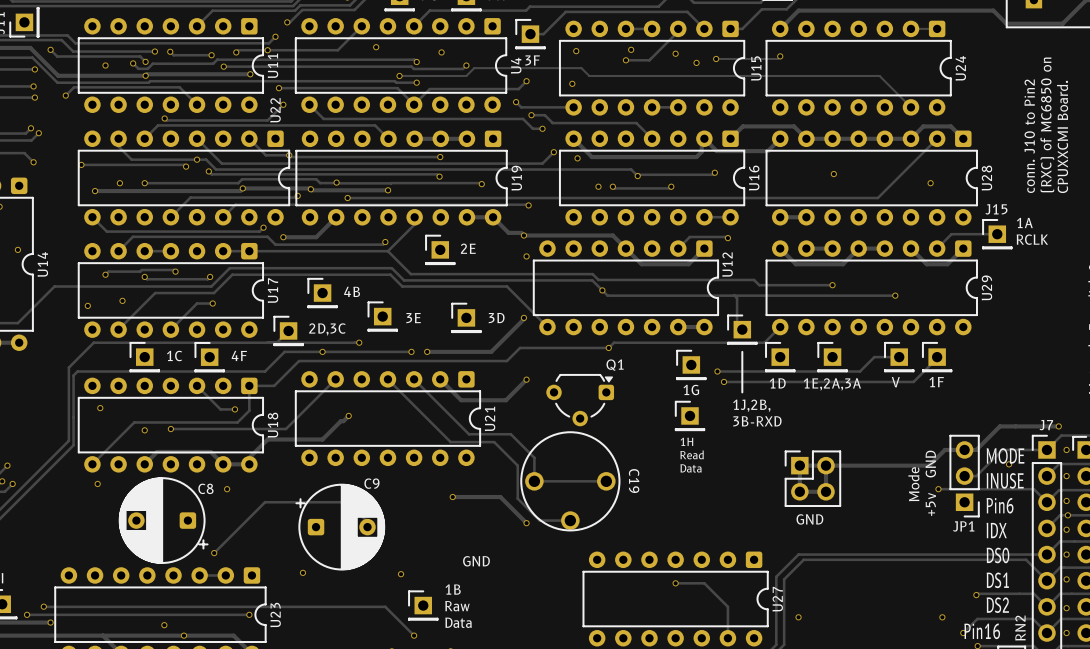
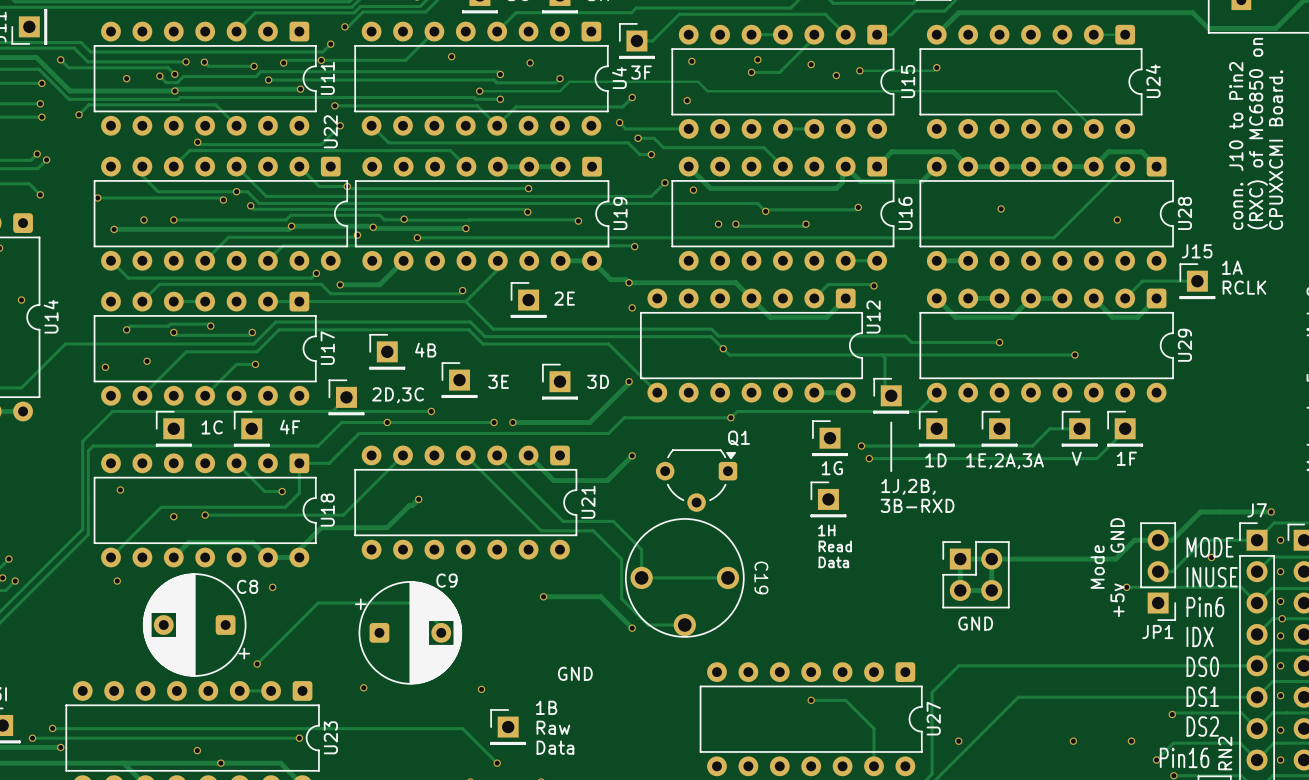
track: (1046, 580) (1026, 559) (803, 559) (784, 579) (784, 644) -> (1257, 697) (1018, 697) (941, 774)
via: none -> (1073, 741)

